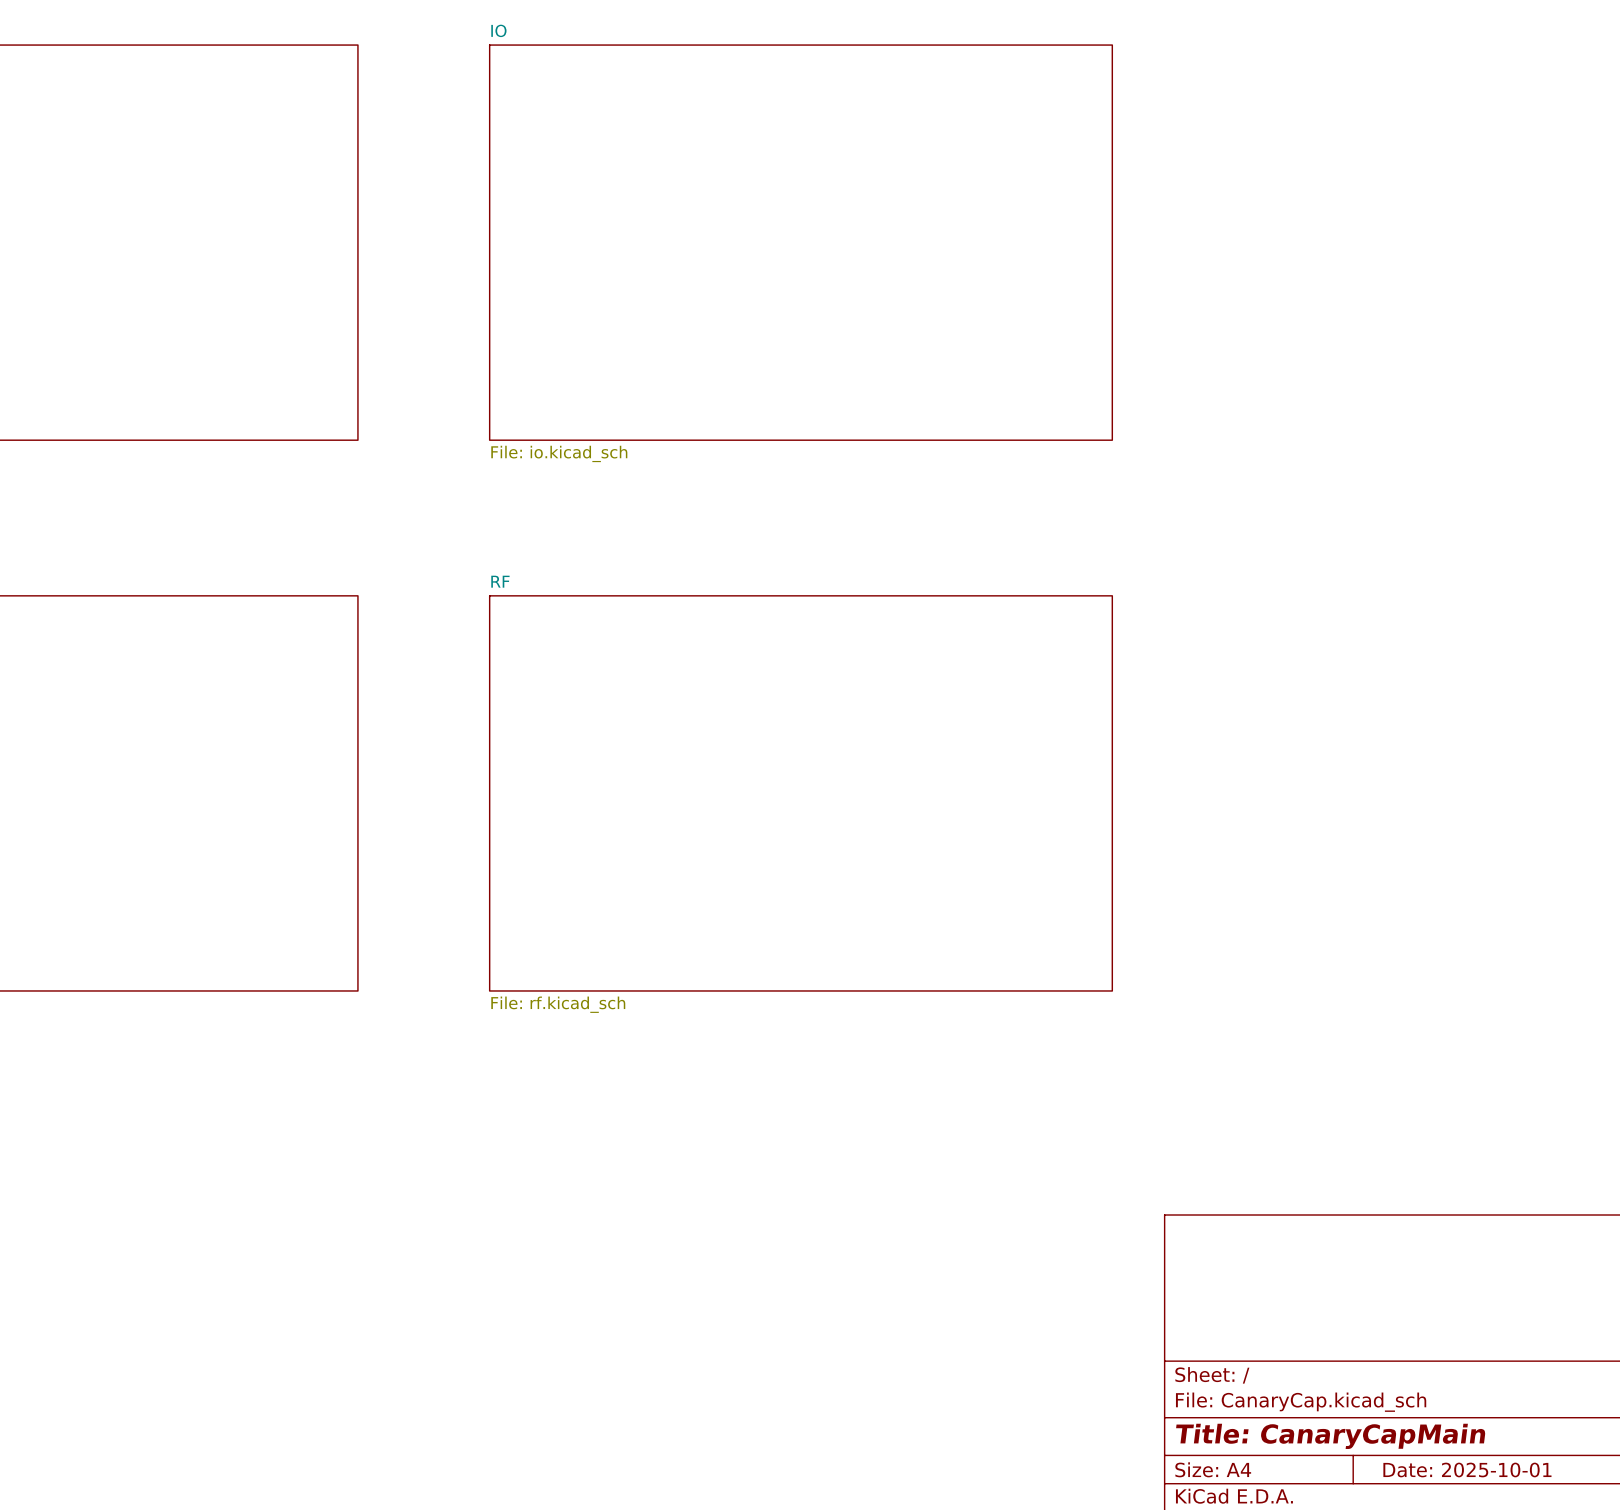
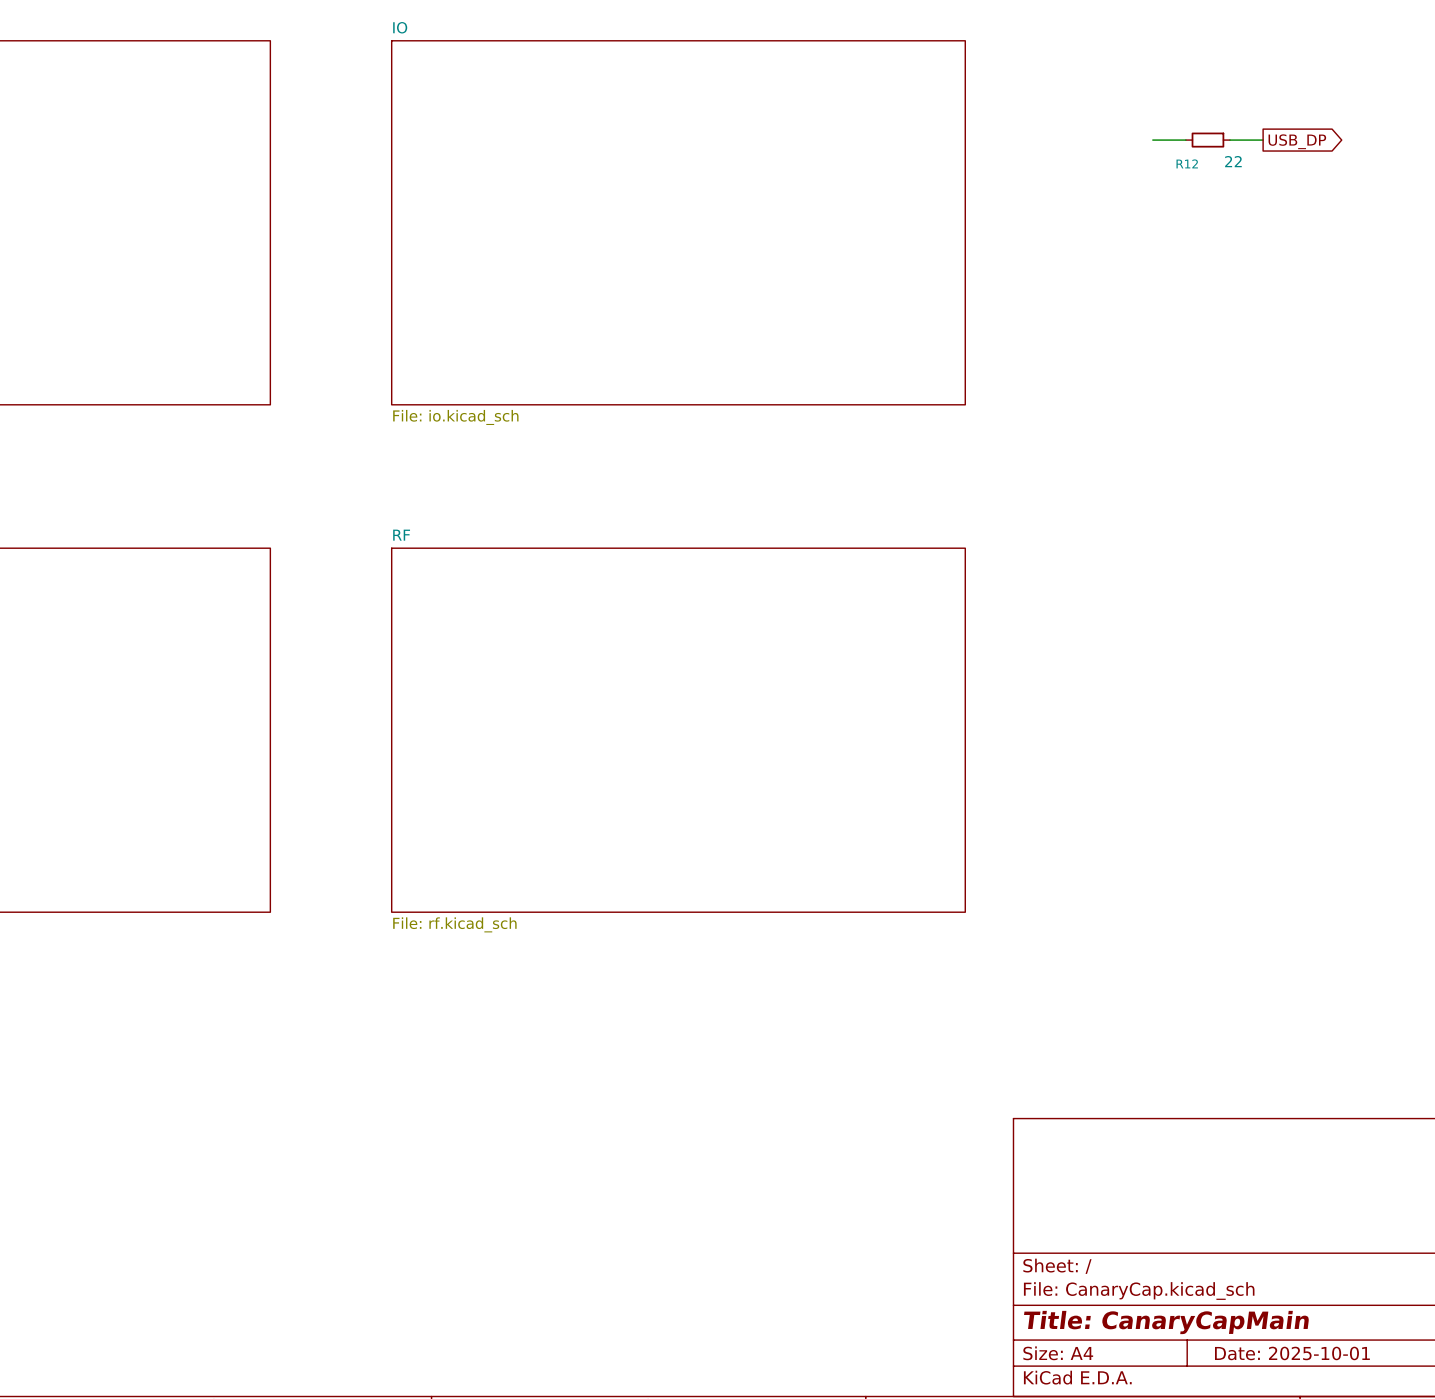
wire: none -> (1152, 140) (1185, 140)
R12: none -> 22 (1207, 140)
wire: none -> (1230, 140) (1263, 140)
global label: none -> USB_DP (1297, 141)

